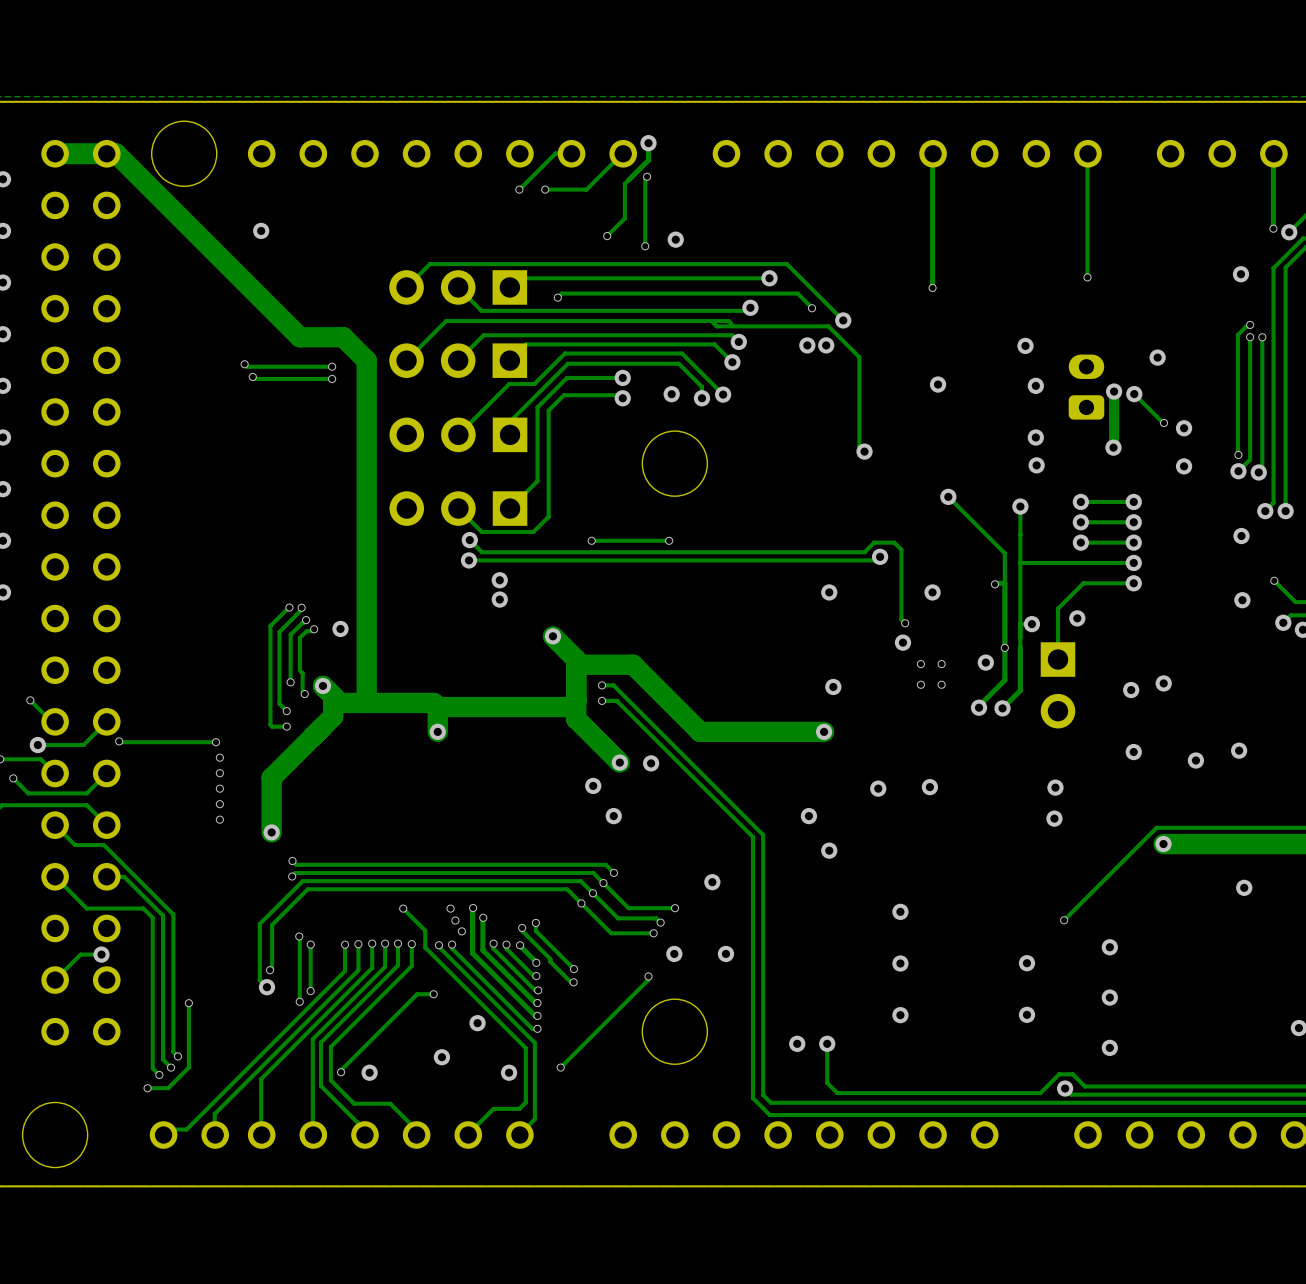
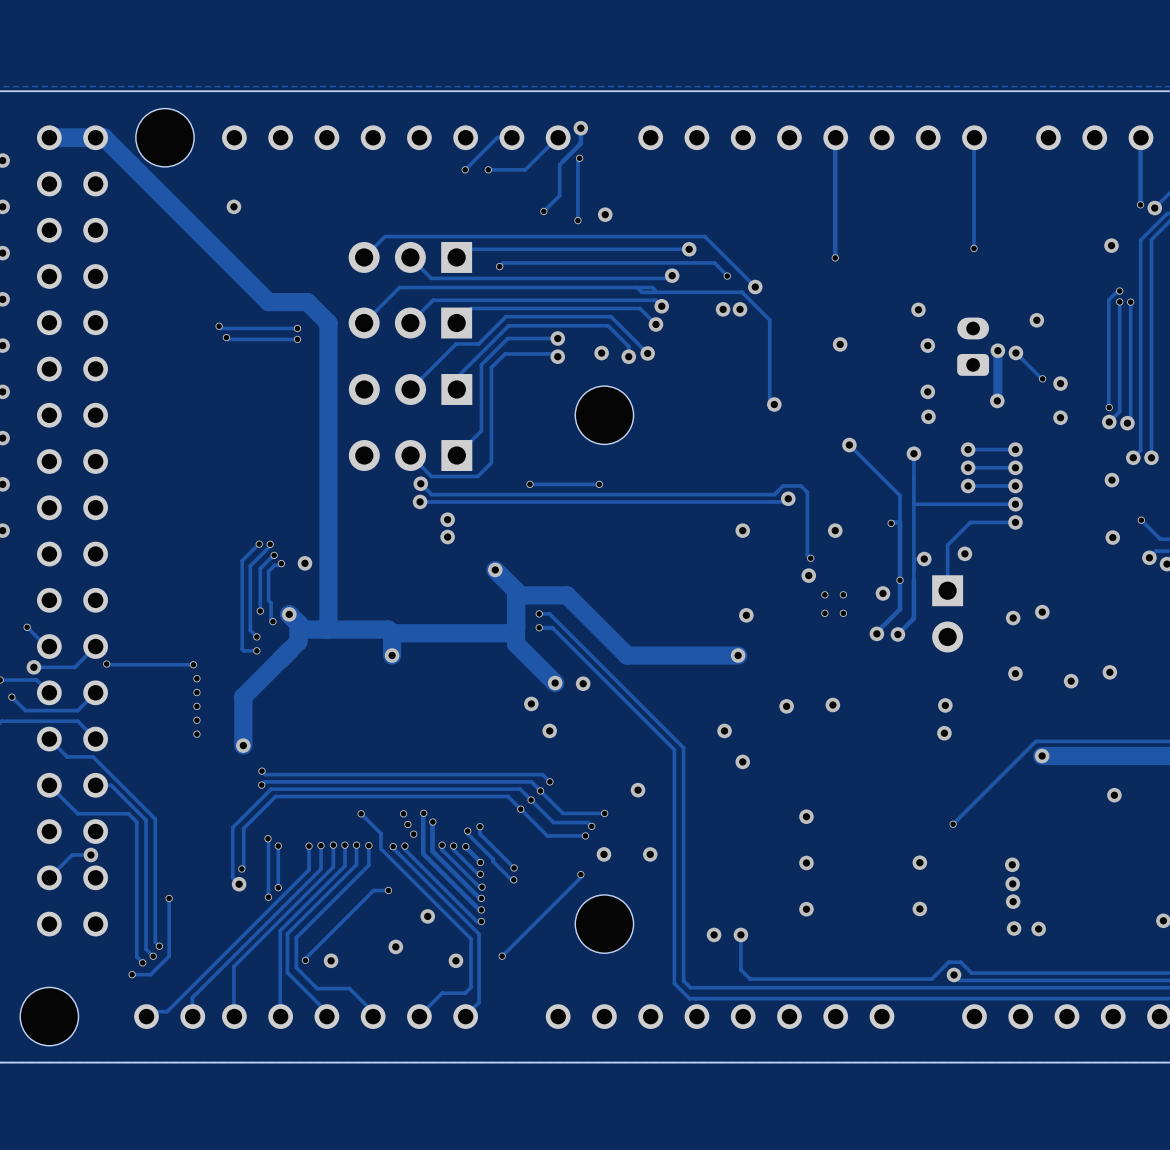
via: (1109, 947) -> none
via: none -> (1012, 864)
via: none -> (1012, 883)
via: (1109, 997) -> none
via: none -> (1013, 901)
via: none -> (1014, 928)
via: none -> (1038, 928)
via: (1109, 1047) -> none

